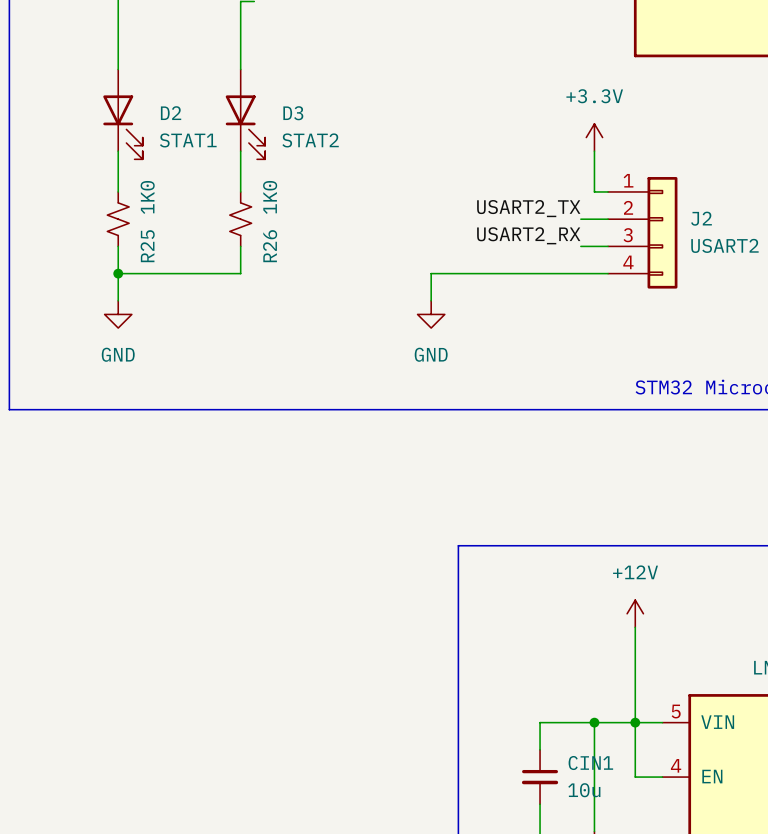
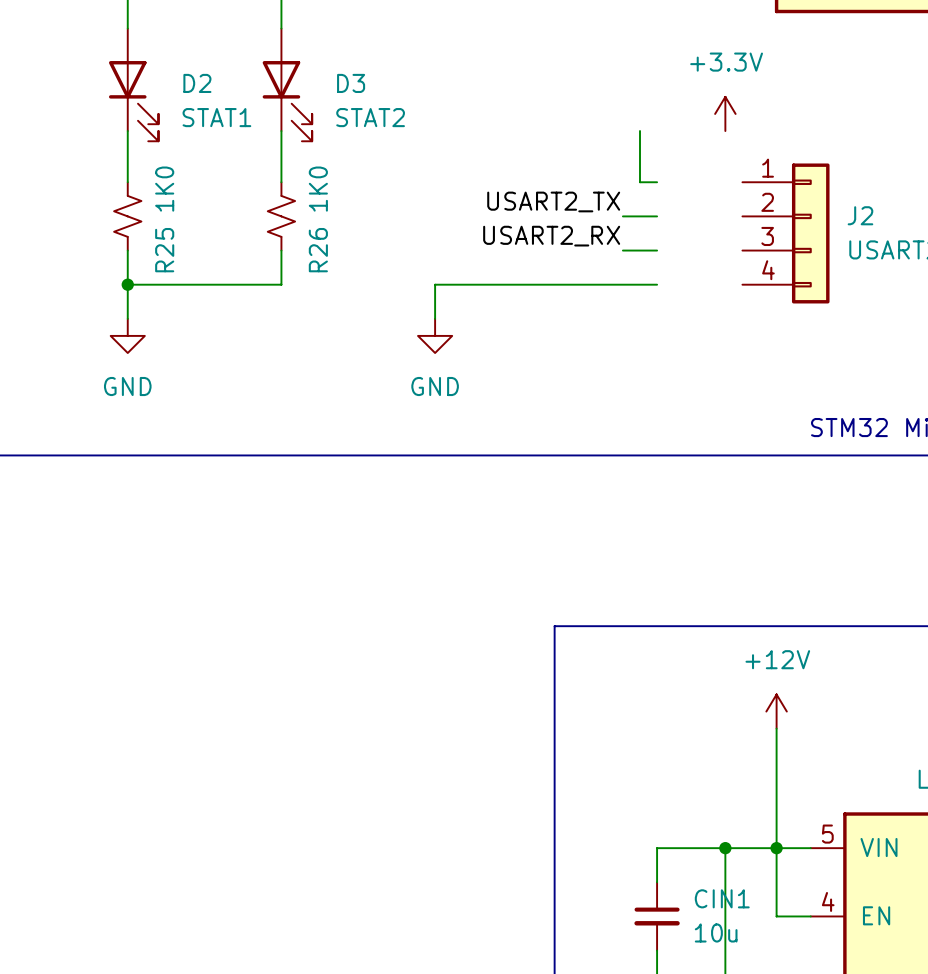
wire: (594, 151) (594, 191) (608, 191) -> (640, 131) (640, 182) (657, 182)
label position: USART2_TX (528, 208) -> USART2_TX (553, 201)
wire: (580, 219) (608, 219) -> (622, 216) (657, 216)
label position: USART2_RX (528, 235) -> USART2_RX (551, 236)
wire: (580, 246) (608, 246) -> (622, 250) (657, 250)
wire: (431, 273) (431, 300) -> (520, 284) (435, 284) (435, 318)
wire: (540, 273) (608, 273) -> none
power symbol position: GND (431, 314) -> GND (435, 335)

